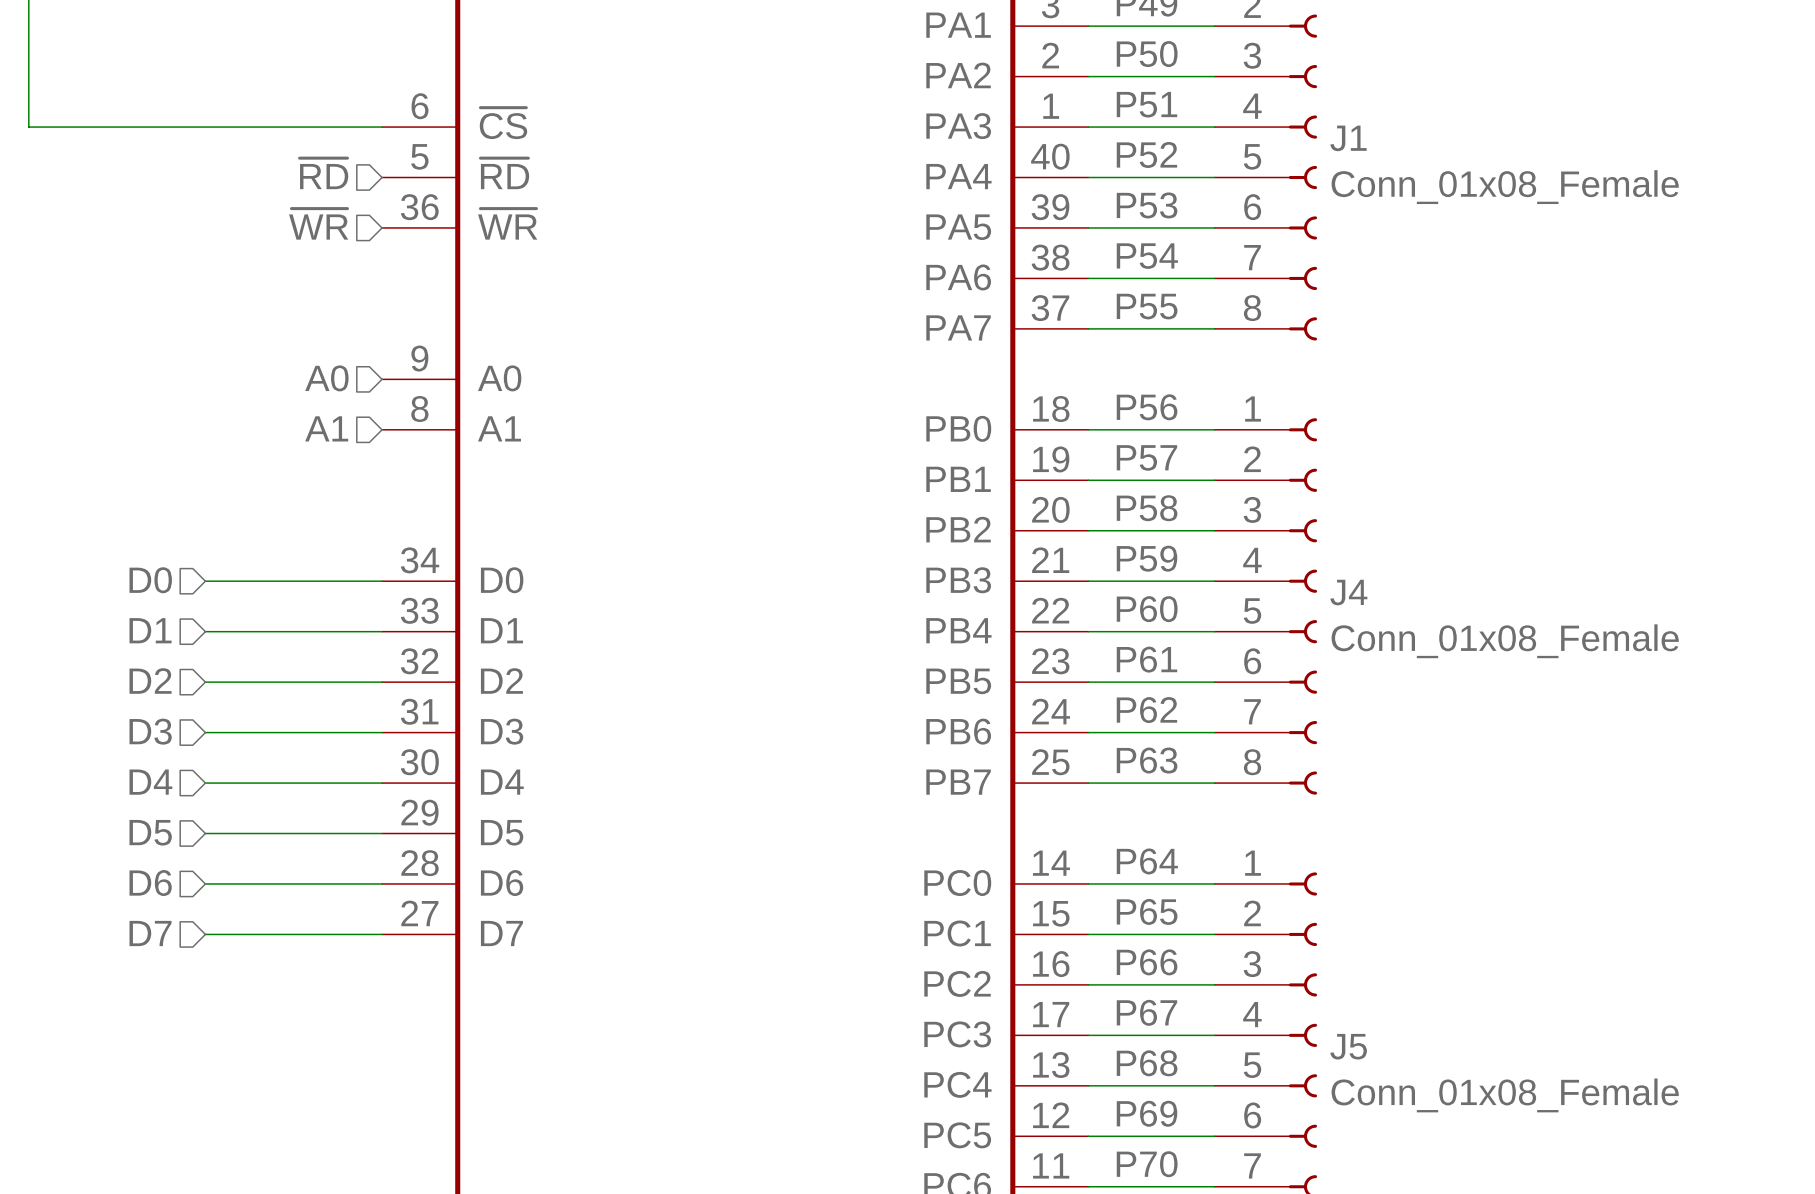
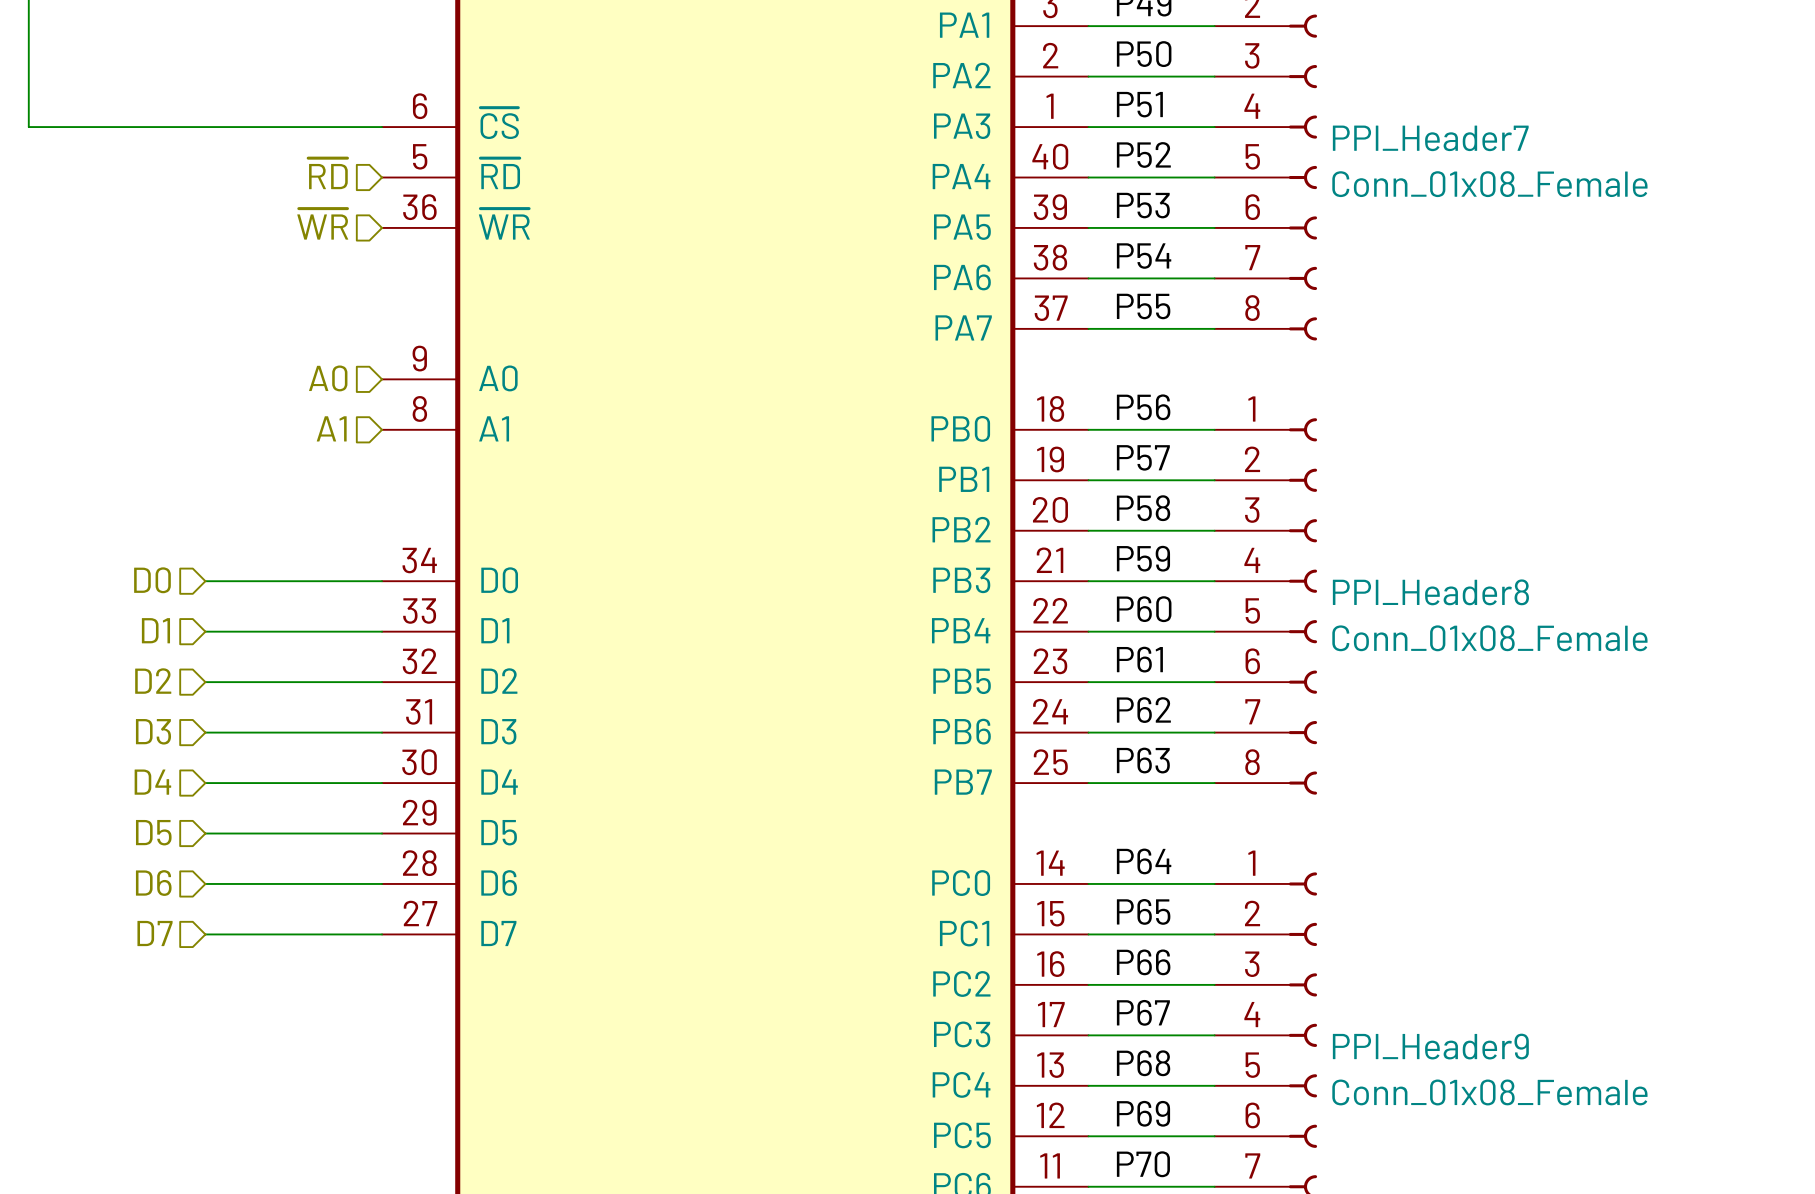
J1 name: J1 (1348, 138) -> PPI_Header7 (1430, 138)
J4 name: J4 (1348, 592) -> PPI_Header8 (1430, 592)
J5 name: J5 (1348, 1046) -> PPI_Header9 (1430, 1046)

